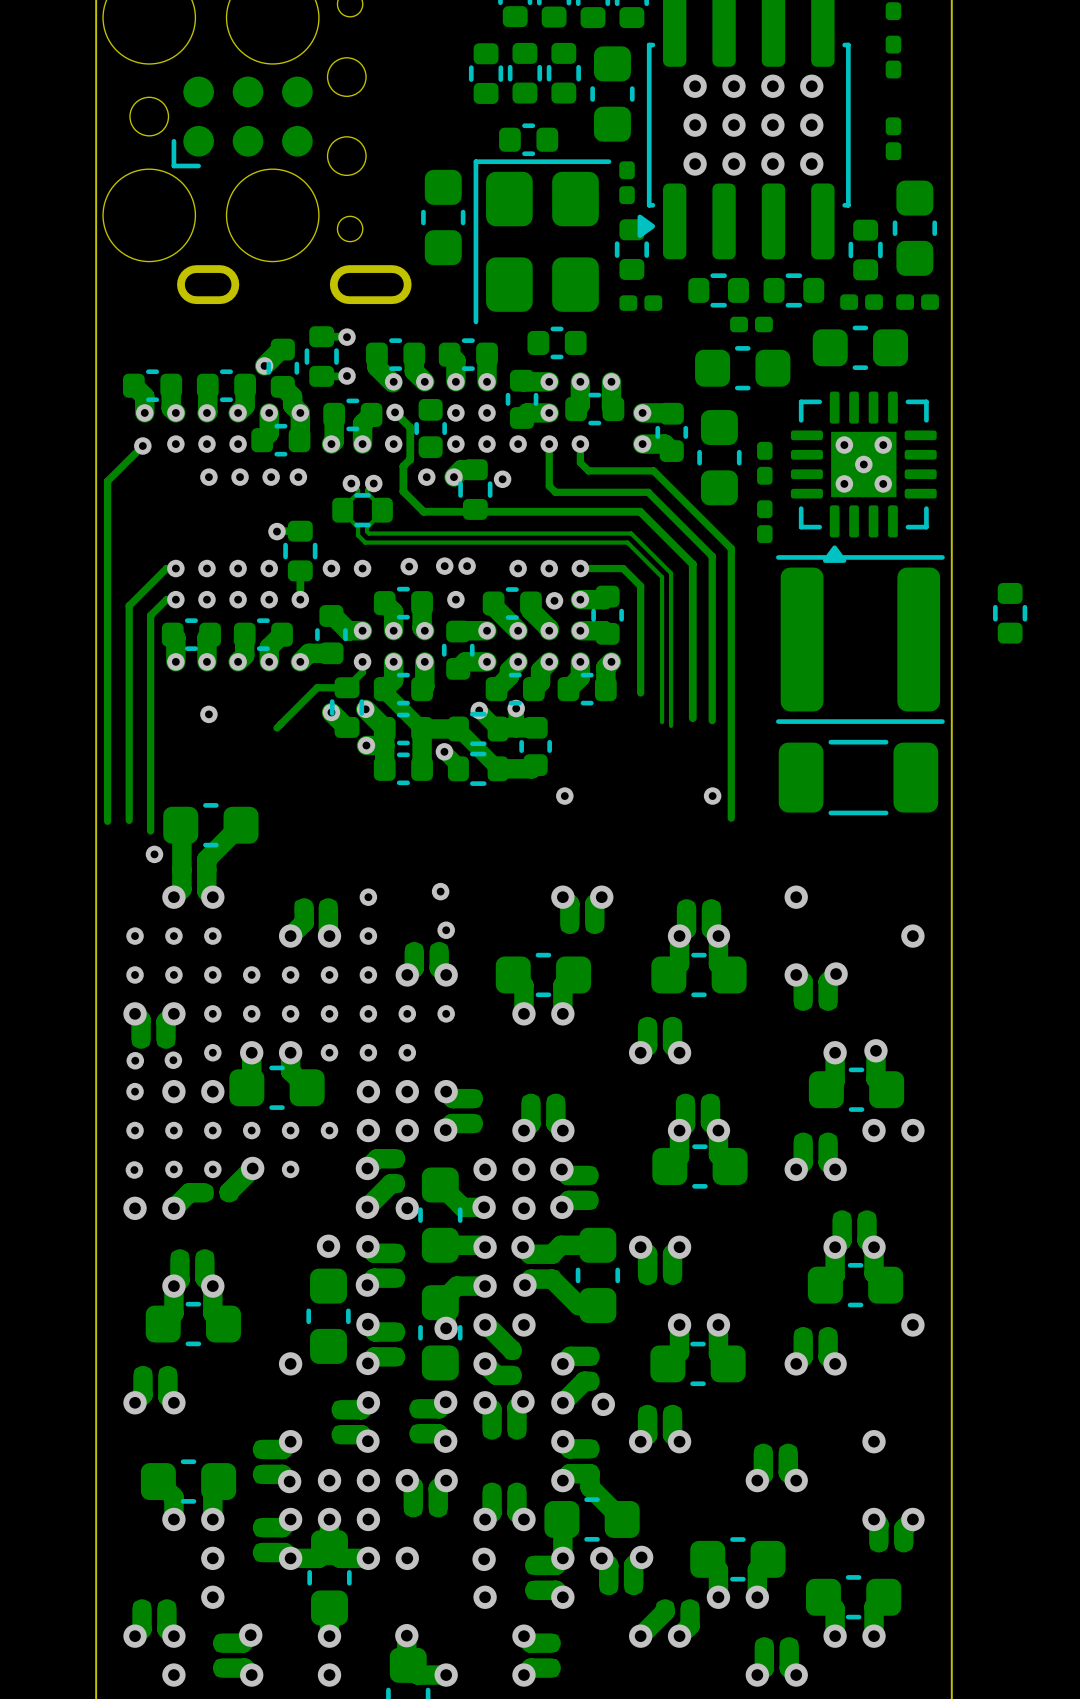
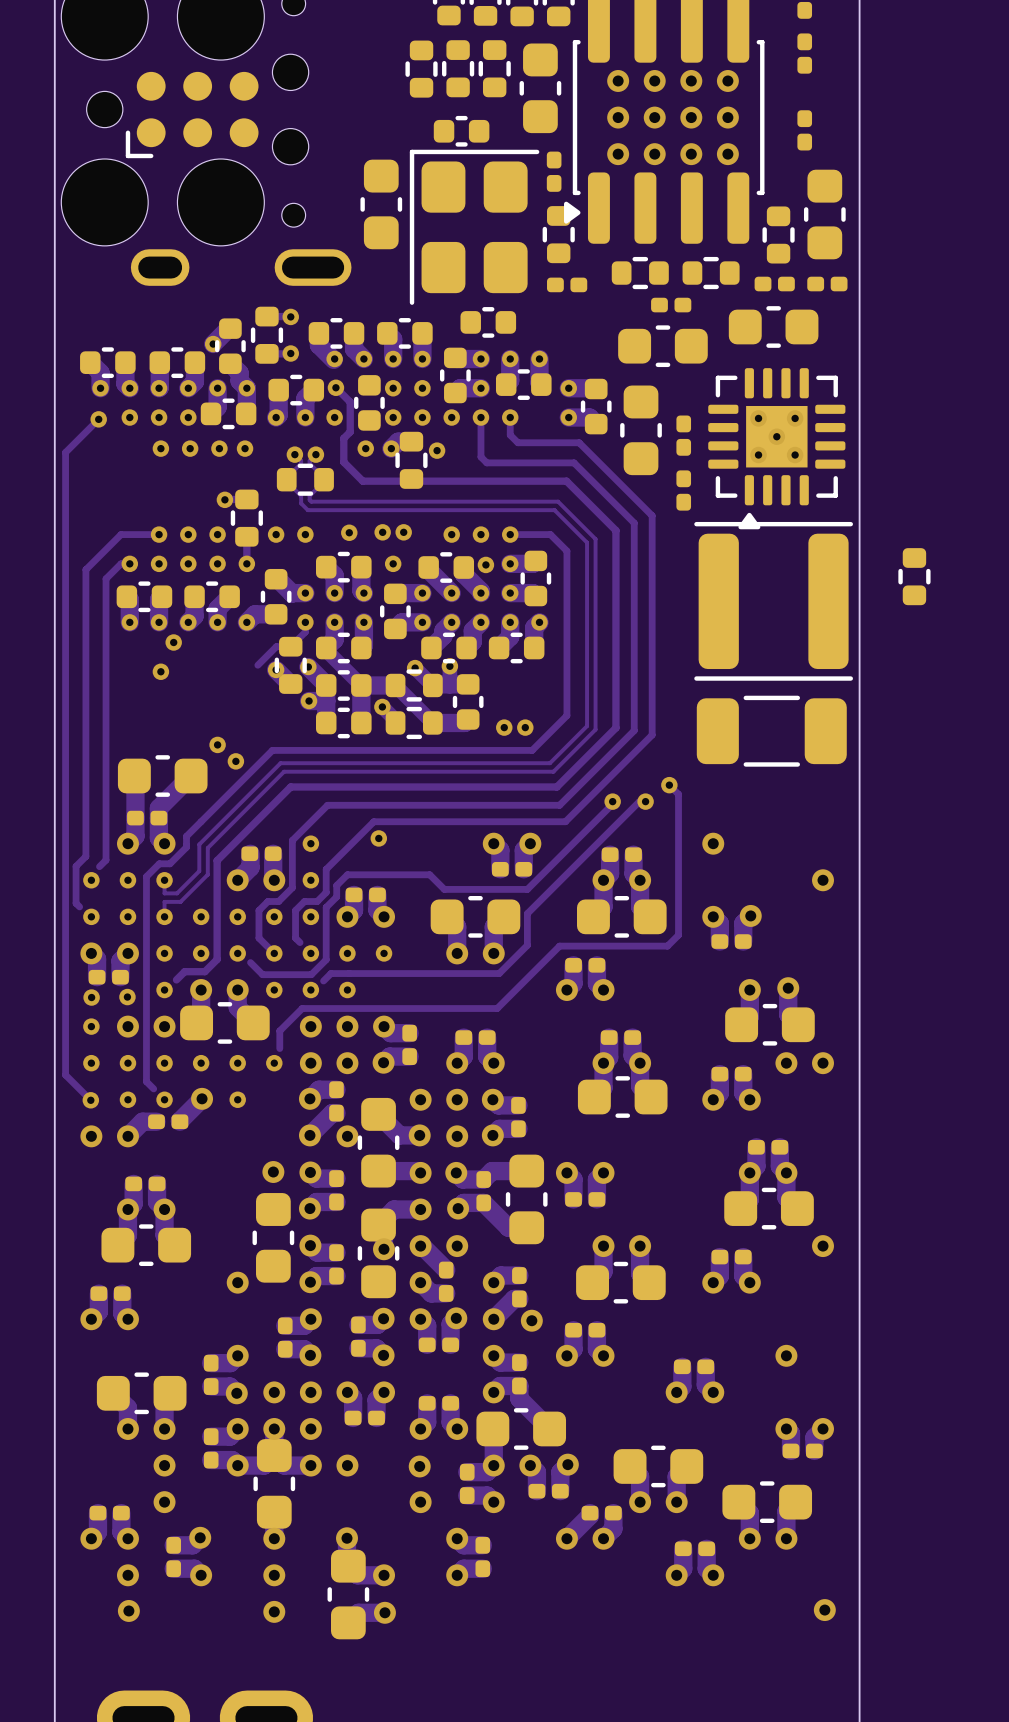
via: (175, 568) -> none
track: none -> (159, 534) (129, 534)
via: none -> (173, 642)
track: (331, 687) (317, 687) (277, 727) -> (276, 646) (257, 665)
track: none -> (566, 651) (566, 715) (532, 750) (272, 750) (186, 836) (186, 847) (169, 863) (159, 863) (146, 876) (146, 1081) (153, 1088)
track: none -> (615, 675) (615, 727) (556, 786) (290, 786) (217, 860) (217, 959) (204, 971) (184, 971) (176, 979)
track: none -> (634, 677) (634, 730) (559, 805) (327, 805) (292, 840) (292, 887) (278, 901) (267, 901) (258, 910) (258, 938) (274, 953)
track: none -> (587, 679) (587, 726) (549, 763) (280, 763) (199, 844) (199, 871) (177, 893) (164, 893) (164, 880)
track: none -> (595, 682) (595, 729) (553, 771) (284, 771) (207, 847) (207, 874) (180, 901) (164, 901) (164, 916)
via: none -> (504, 727)
via: none -> (525, 727)
track: (731, 781) (731, 818) -> (652, 735) (565, 821) (373, 821) (326, 869) (326, 892) (317, 901) (304, 901) (295, 910) (295, 938) (300, 942)
via: none -> (217, 744)
via: (564, 796) -> none
via: (712, 796) -> none
via: none -> (235, 761)
track: none -> (85, 771) (85, 856) (76, 866) (76, 903) (79, 906)
track: none -> (65, 772) (65, 1075) (90, 1100)
track: none -> (106, 781) (106, 860) (99, 866)
track: none -> (669, 785) (678, 794) (678, 935) (667, 946) (559, 946) (497, 1008) (302, 1008) (279, 1030) (279, 1048)
via: none -> (669, 785)
track: none -> (612, 801) (612, 804) (527, 889) (444, 889) (429, 874) (347, 874) (336, 885) (336, 896) (326, 907) (326, 959) (311, 974) (262, 974) (250, 962)
via: none -> (612, 801)
track: none -> (645, 801) (639, 801) (527, 913) (527, 945) (499, 973) (330, 973) (323, 981)
via: none -> (645, 801)
via: (154, 854) -> none
via: (446, 930) -> none

